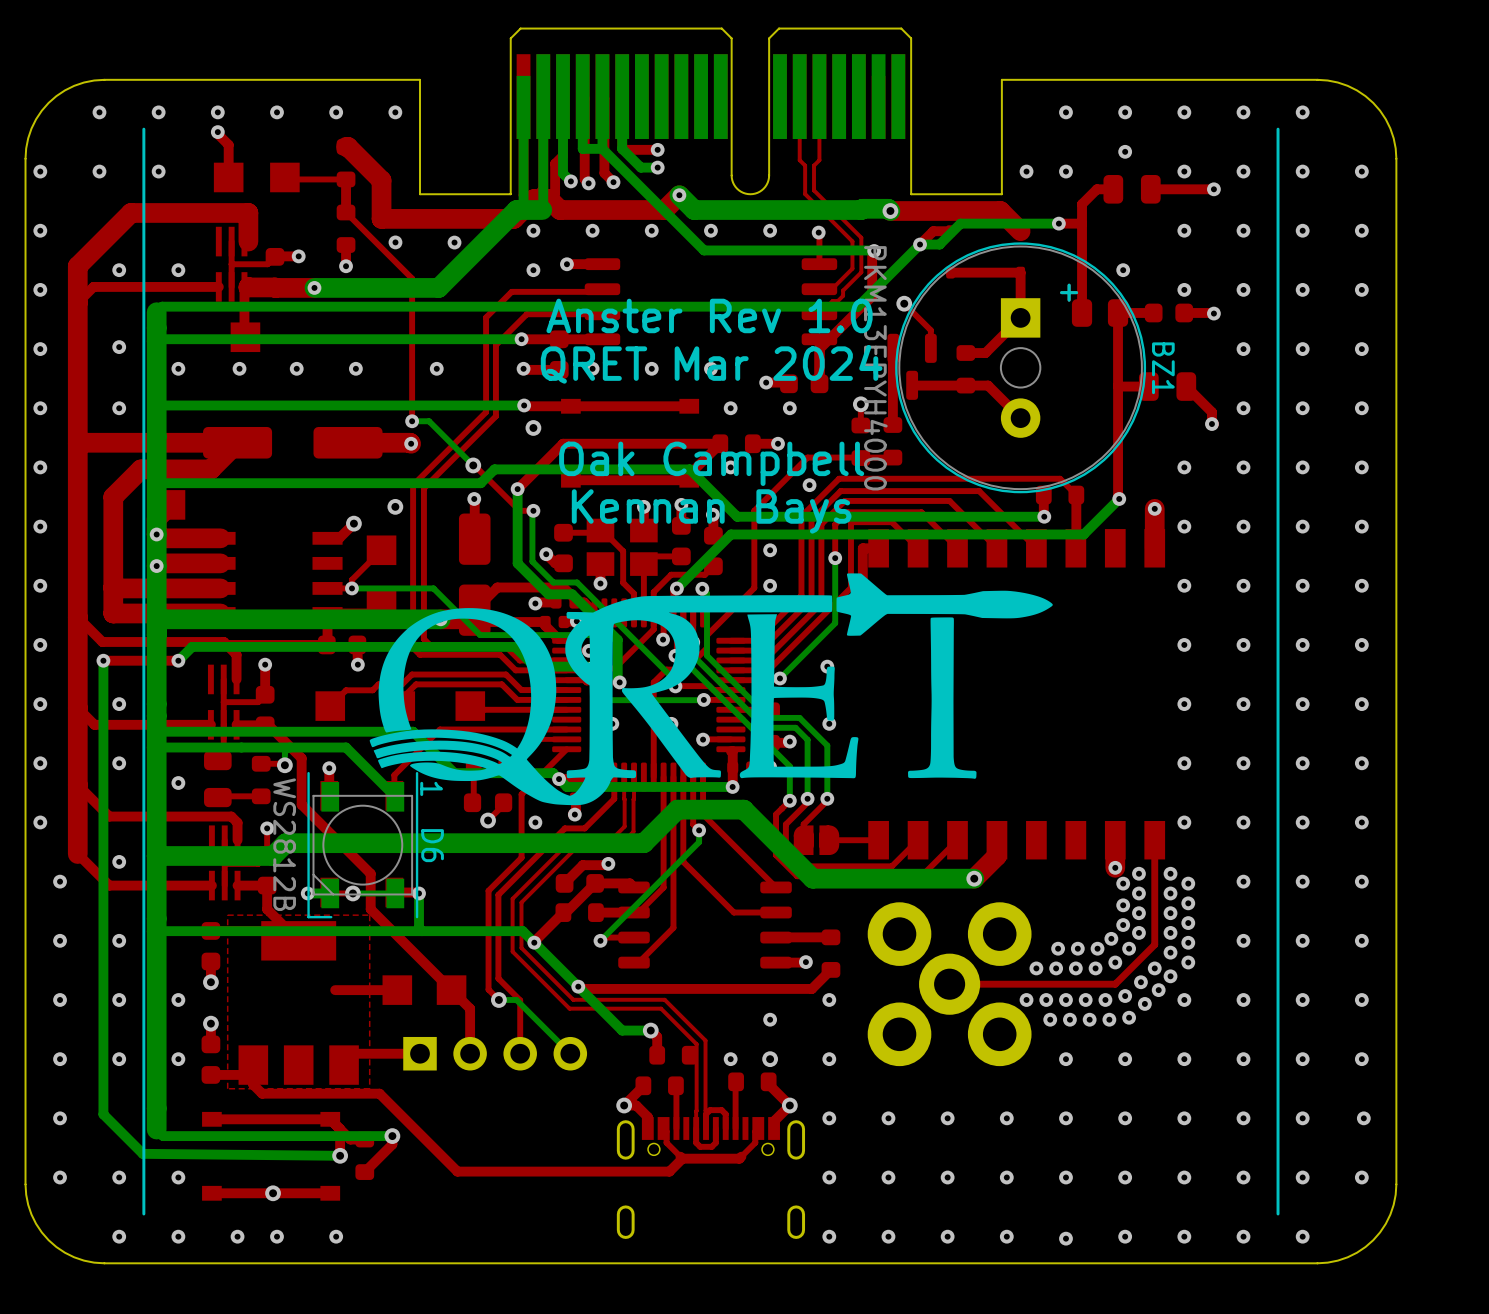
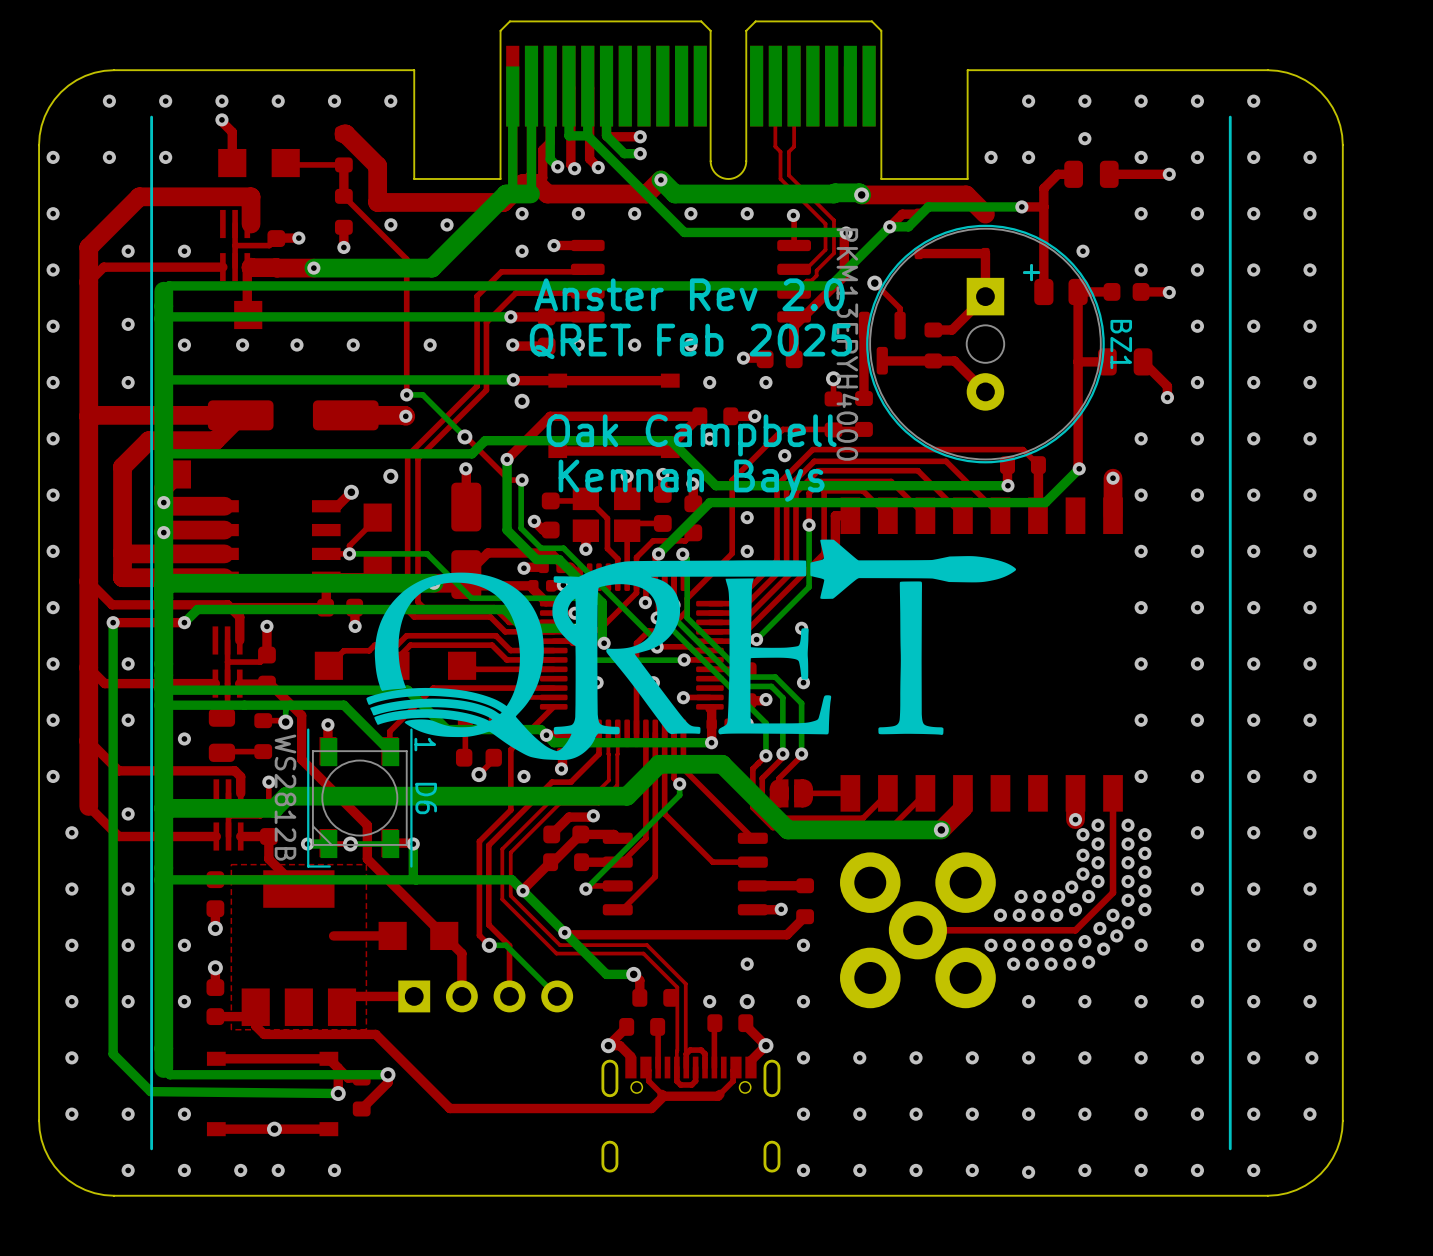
text: Anster Rev 1.0 (709, 315) -> Anster Rev 2.0 (689, 294)
text: QRET Mar 2024 (711, 364) -> QRET Feb 2025 (690, 341)

